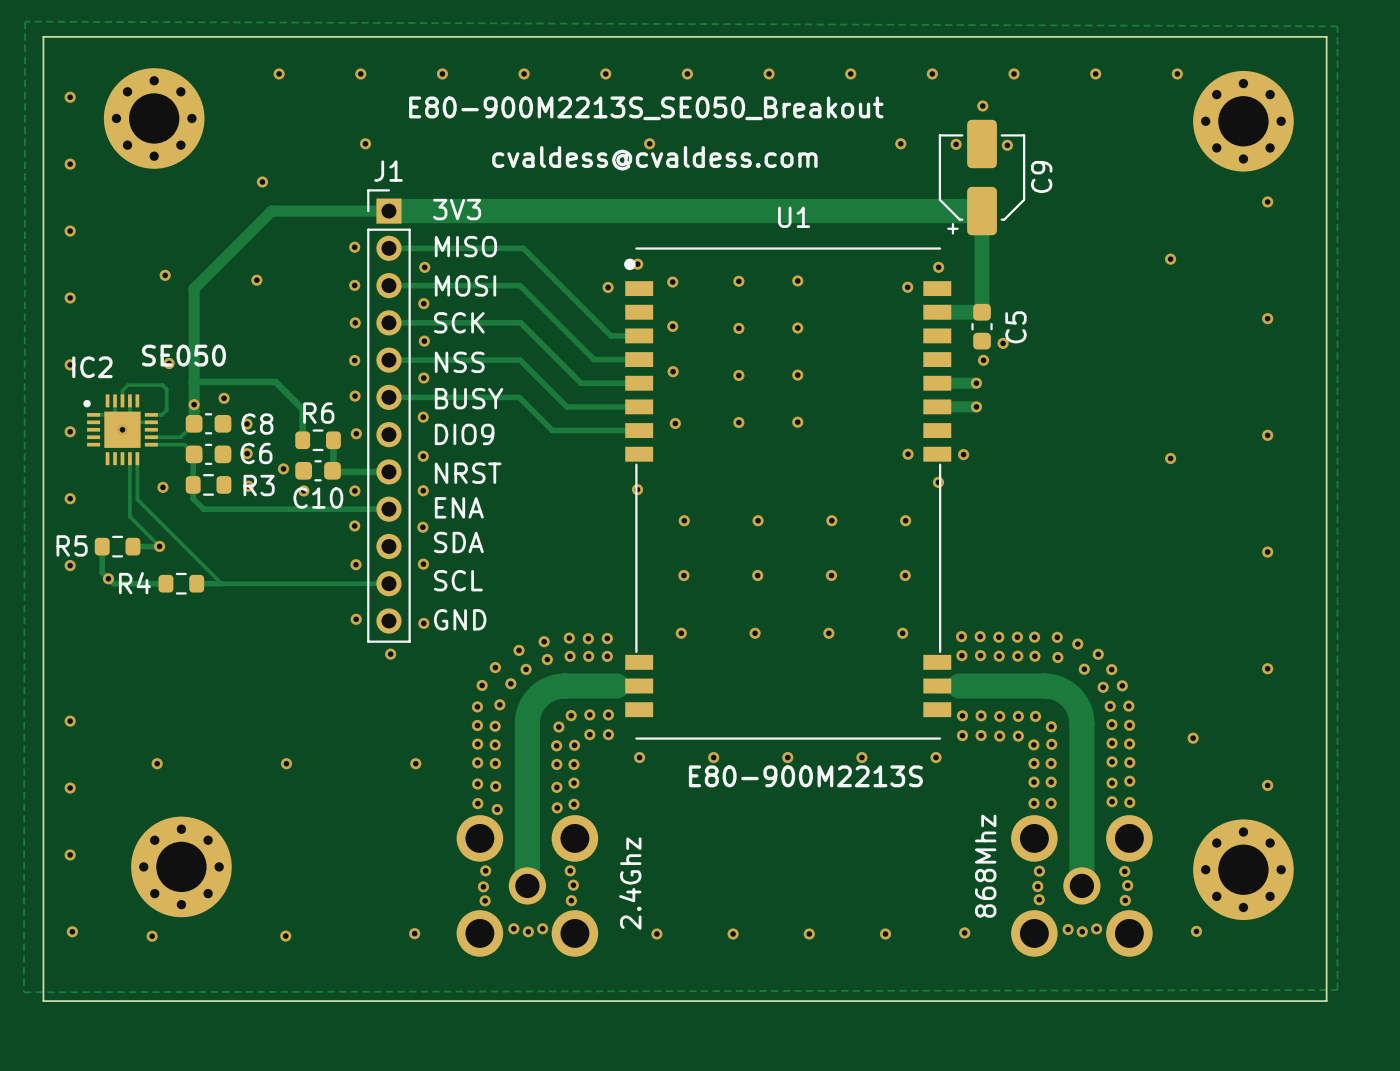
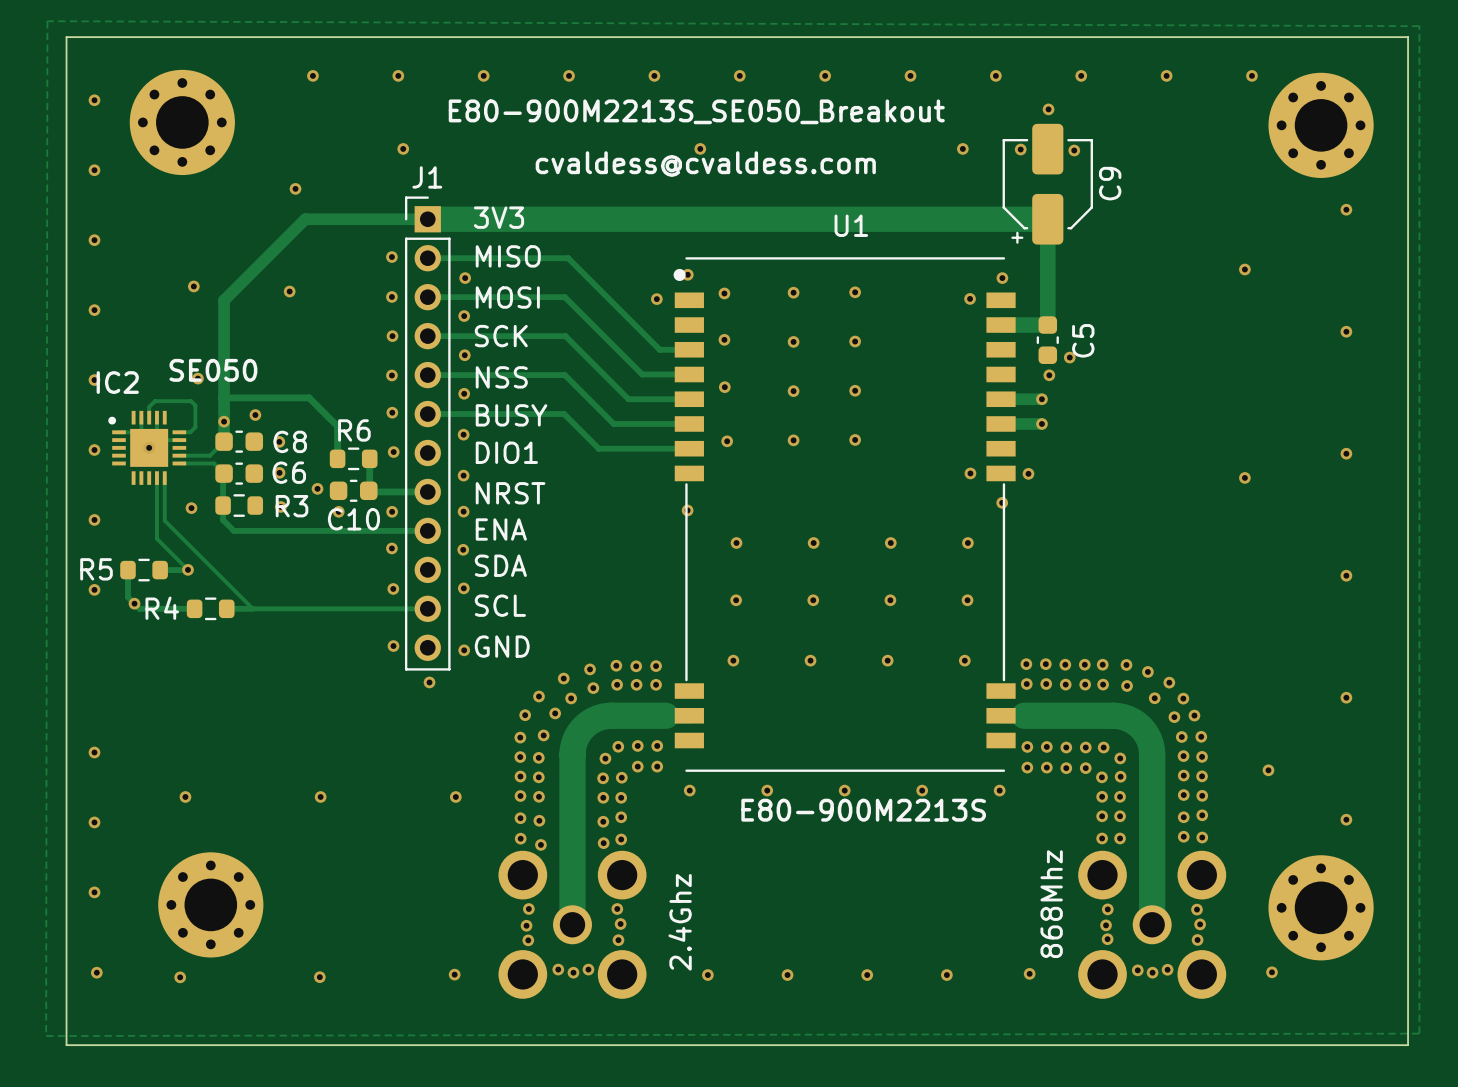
text: DIO9 (464, 434) -> DIO1 (506, 452)

